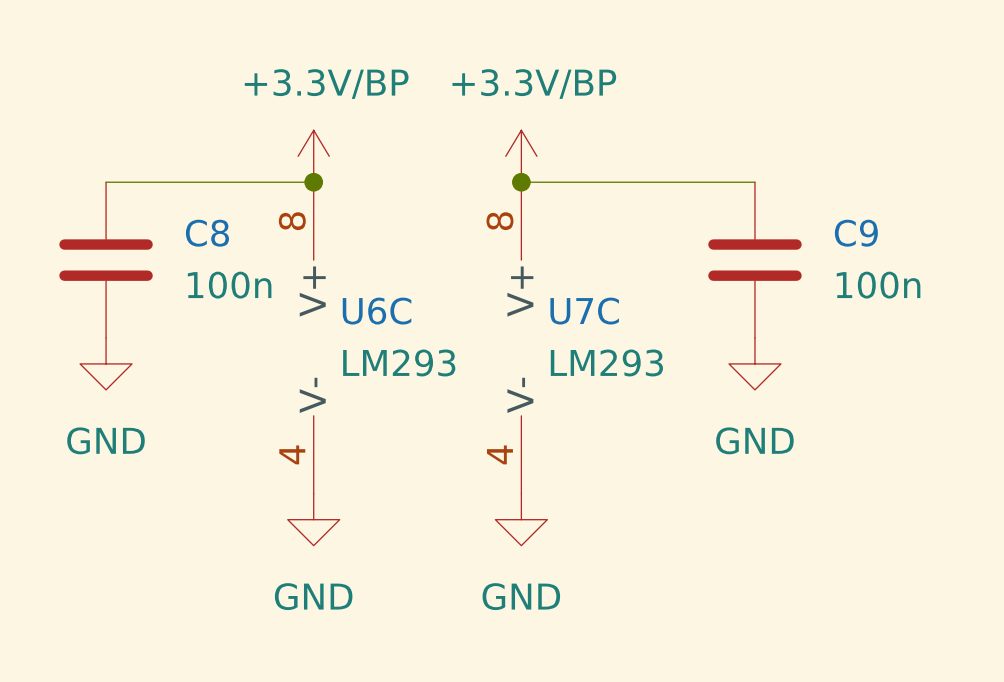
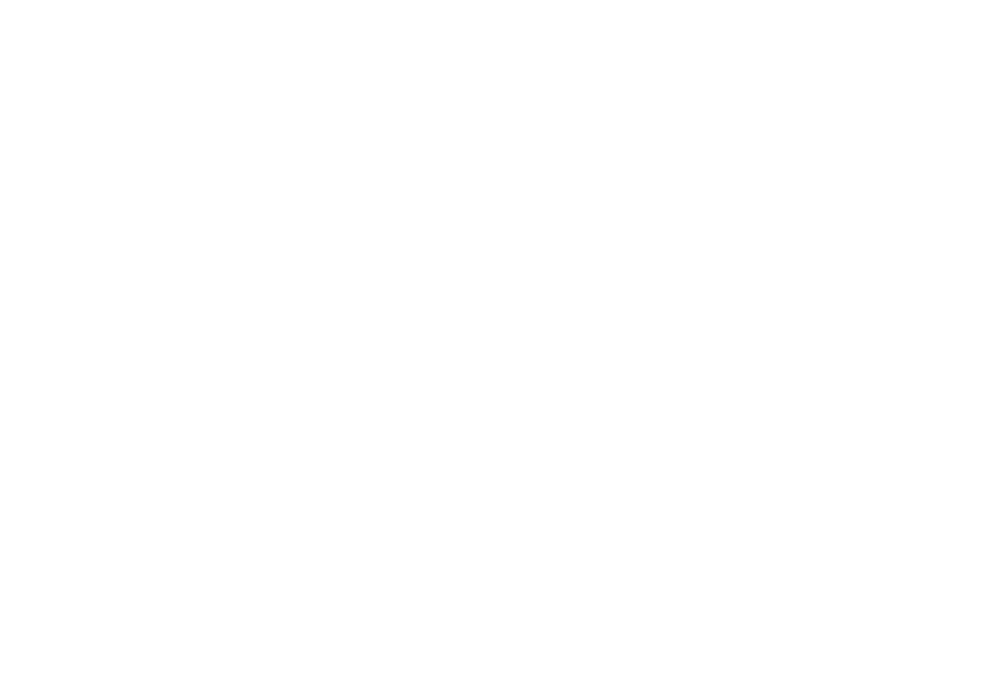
power symbol: +3.3V/BP (313, 156) -> none
power symbol: +3.3V/BP (521, 156) -> none
wire: (106, 182) (313, 182) -> none
junction: (313, 182) -> none
wire: (521, 182) (754, 182) -> none
junction: (521, 182) -> none
C8: 100n (106, 260) -> none
C9: 100n (754, 260) -> none
U6C: LM293 (313, 337) -> none
U7C: LM293 (521, 337) -> none
power symbol: GND (106, 363) -> none
power symbol: GND (754, 363) -> none
power symbol: GND (313, 519) -> none
power symbol: GND (521, 519) -> none

